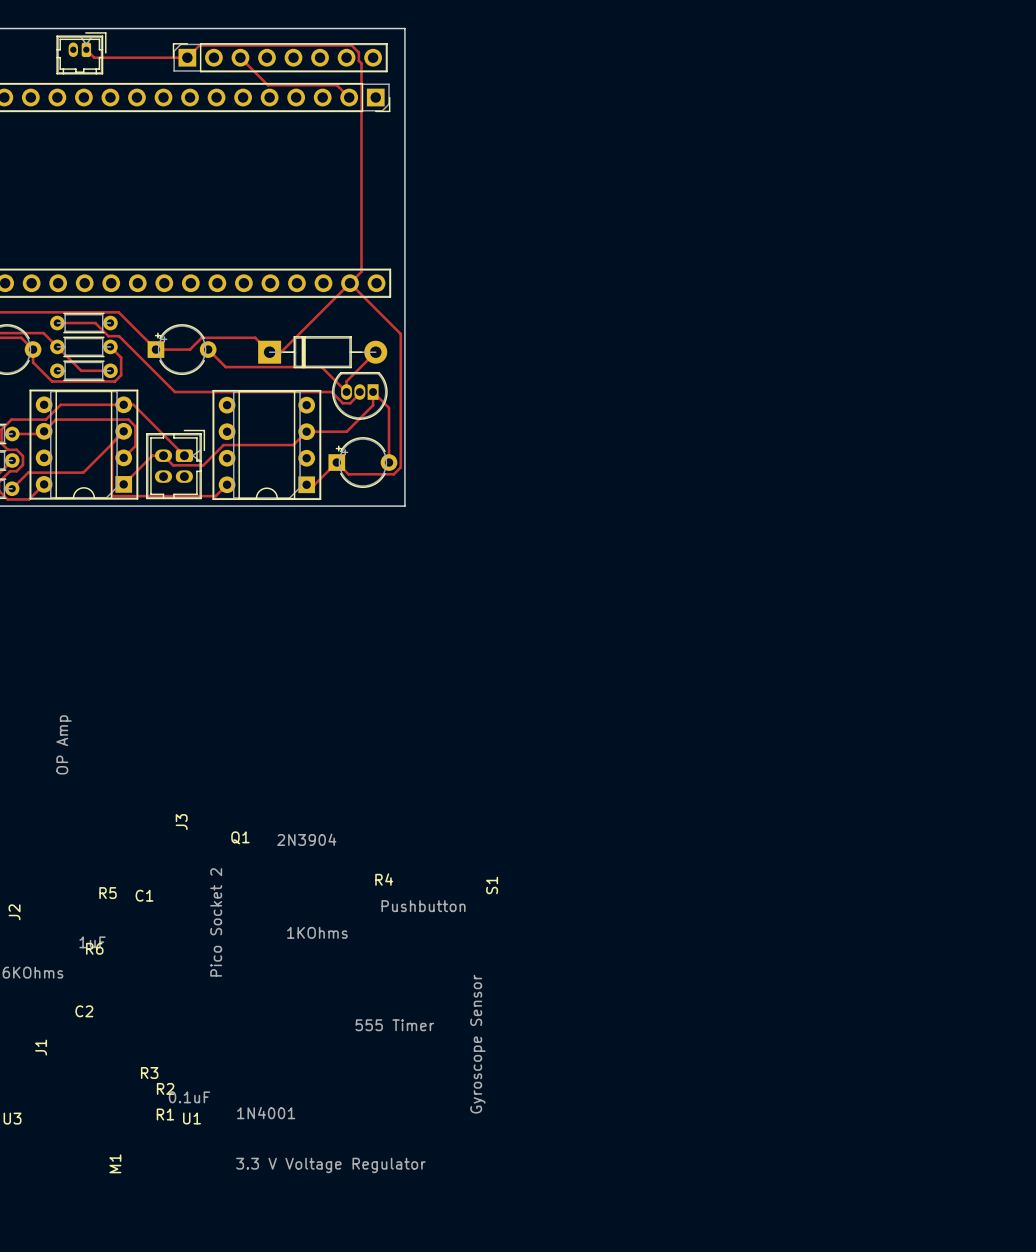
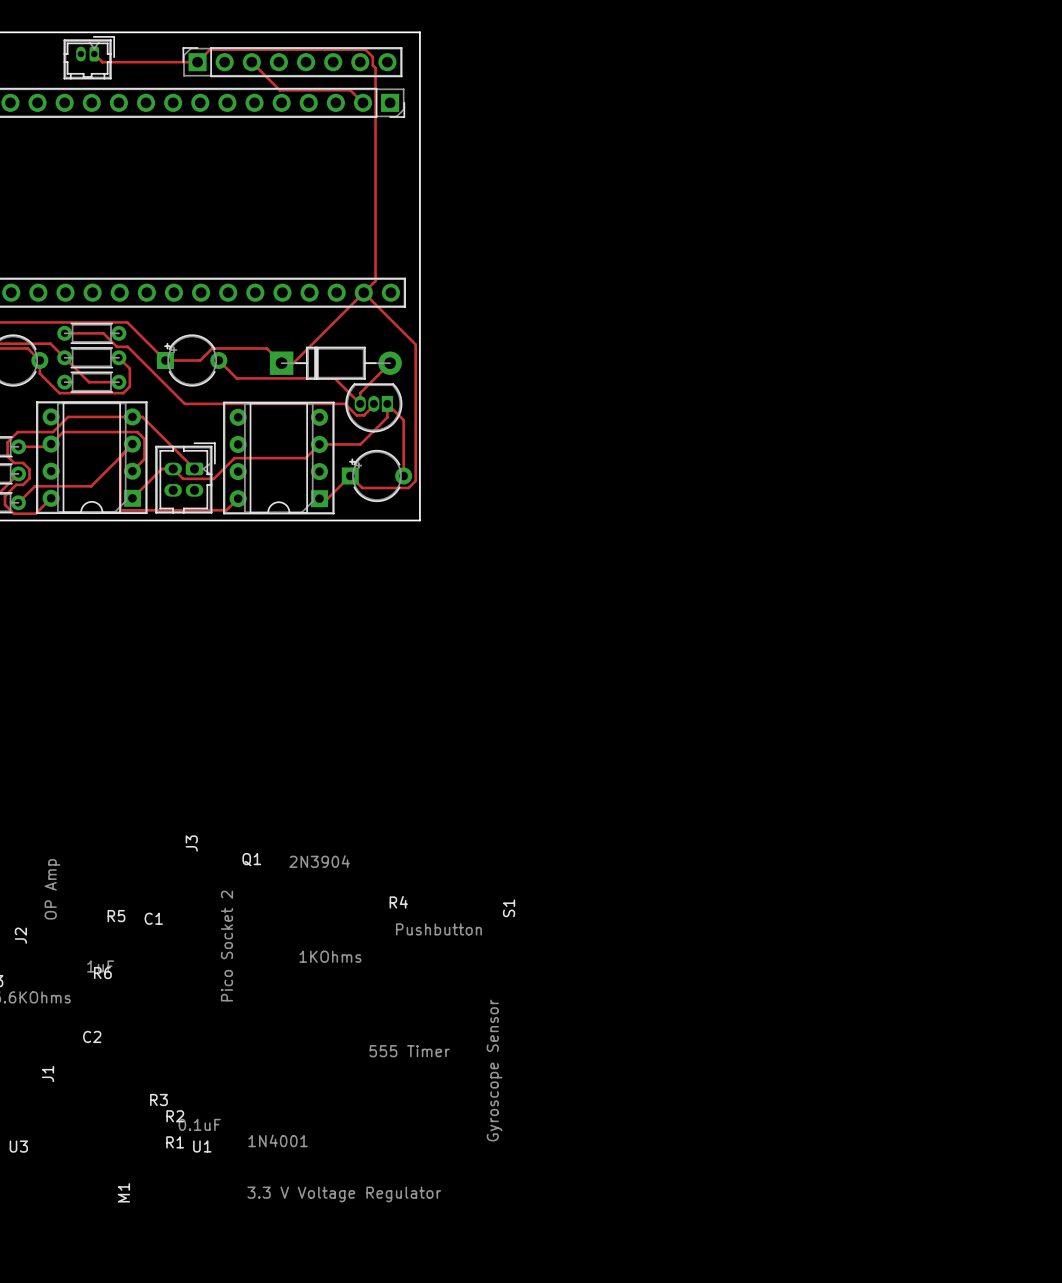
part value position: OP Amp (64, 744) -> OP Amp (52, 889)

